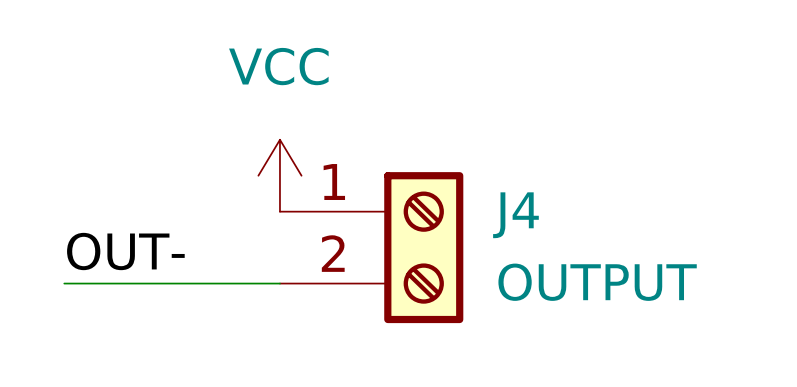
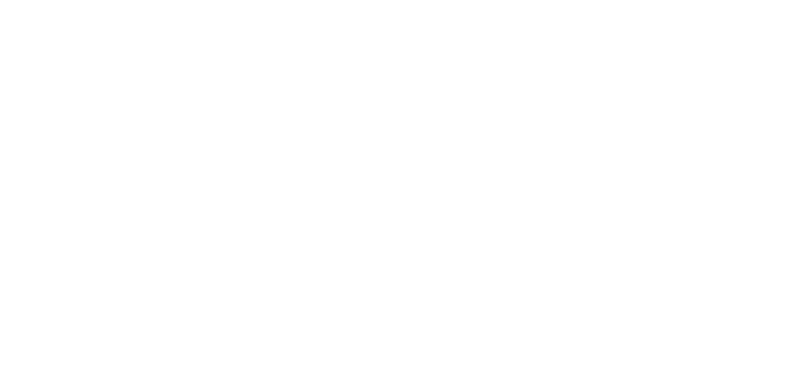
power symbol: VCC (279, 175) -> none
J4: OUTPUT (371, 247) -> none
label: OUT- (125, 251) -> none
wire: (64, 283) (279, 283) -> none

